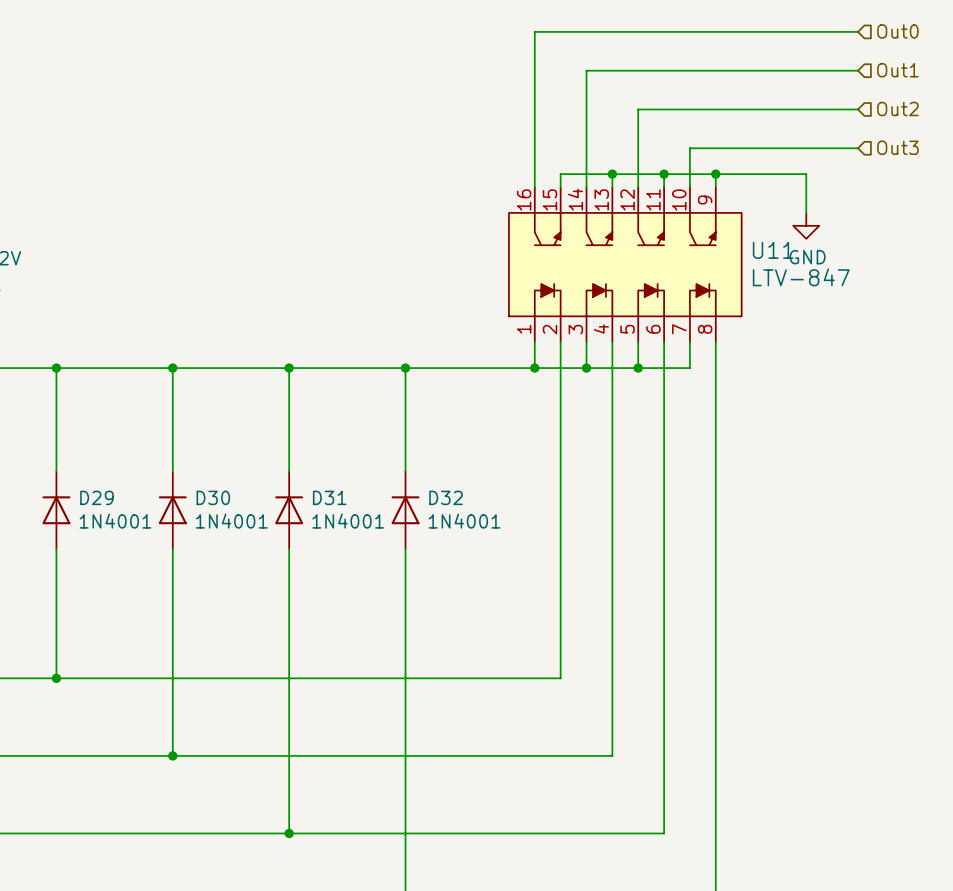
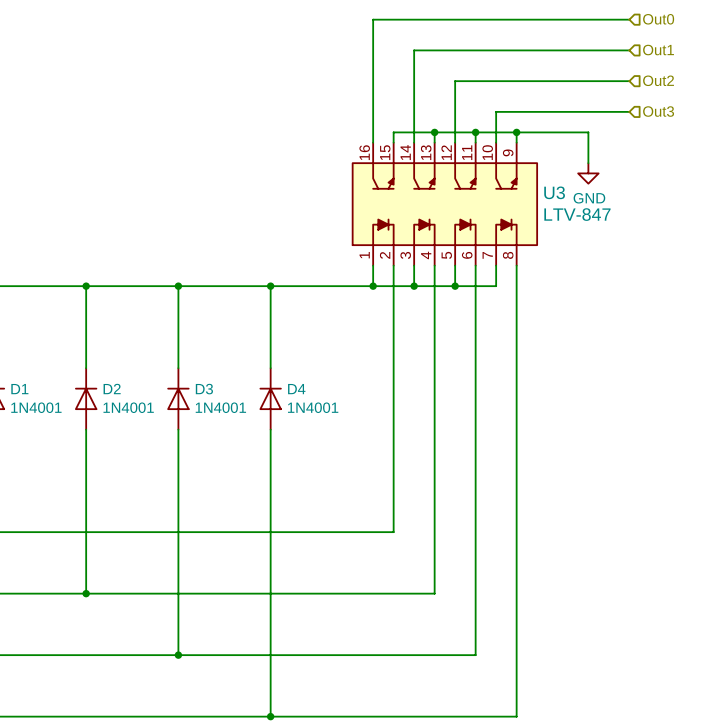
U11 name: U11 (773, 250) -> U3 (554, 192)
D29 name: D29 (96, 497) -> D1 (19, 389)
D30 name: D30 (213, 497) -> D2 (112, 389)
D31 name: D31 (329, 497) -> D3 (204, 389)
D32 name: D32 (446, 497) -> D4 (296, 389)

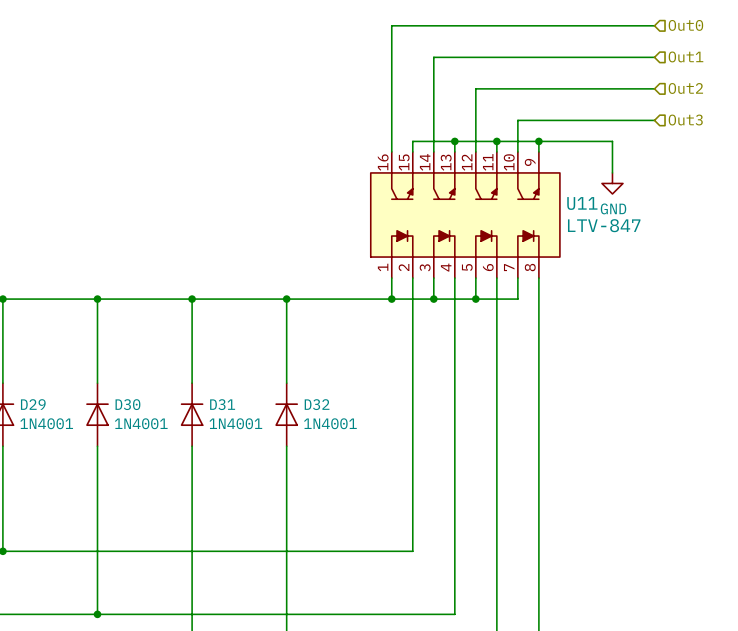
U3 name: U3 (554, 192) -> U11 (582, 203)
D1 name: D1 (19, 389) -> D29 (33, 404)
D2 name: D2 (112, 389) -> D30 (127, 404)
D3 name: D3 (204, 389) -> D31 (222, 404)
D4 name: D4 (296, 389) -> D32 (317, 404)

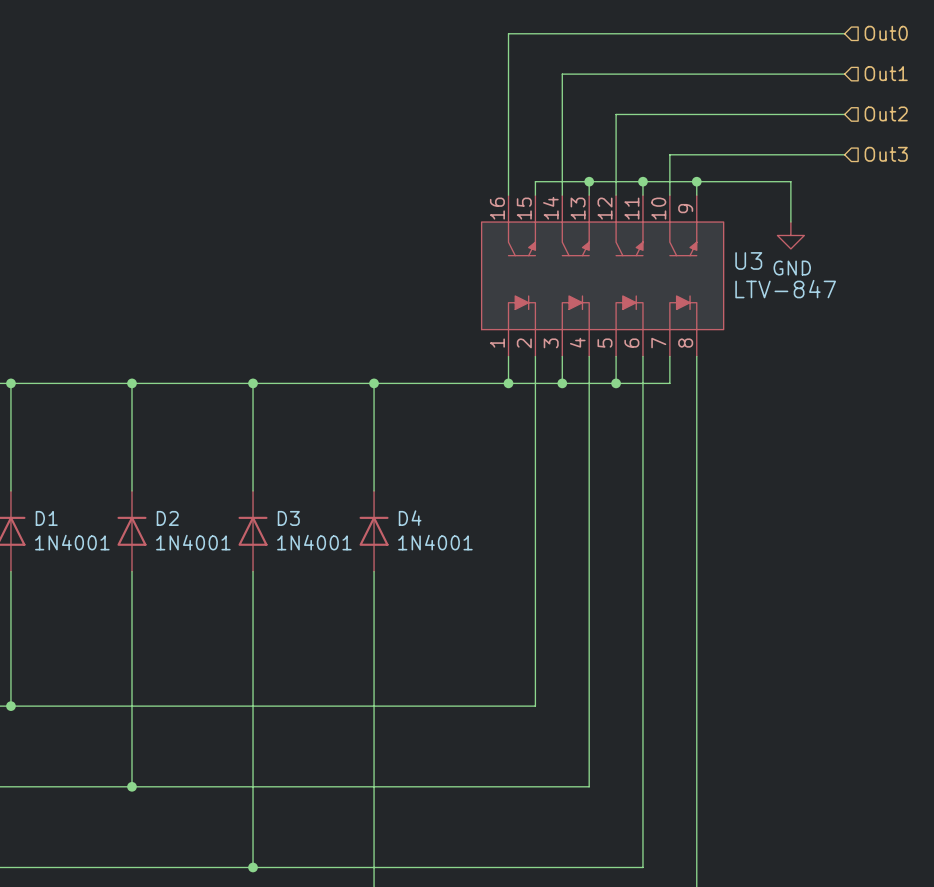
U11 name: U11 (582, 203) -> U3 (748, 260)
D29 name: D29 (33, 404) -> D1 (46, 518)
D30 name: D30 (127, 404) -> D2 (167, 518)
D31 name: D31 (222, 404) -> D3 (288, 518)
D32 name: D32 (317, 404) -> D4 (410, 518)

